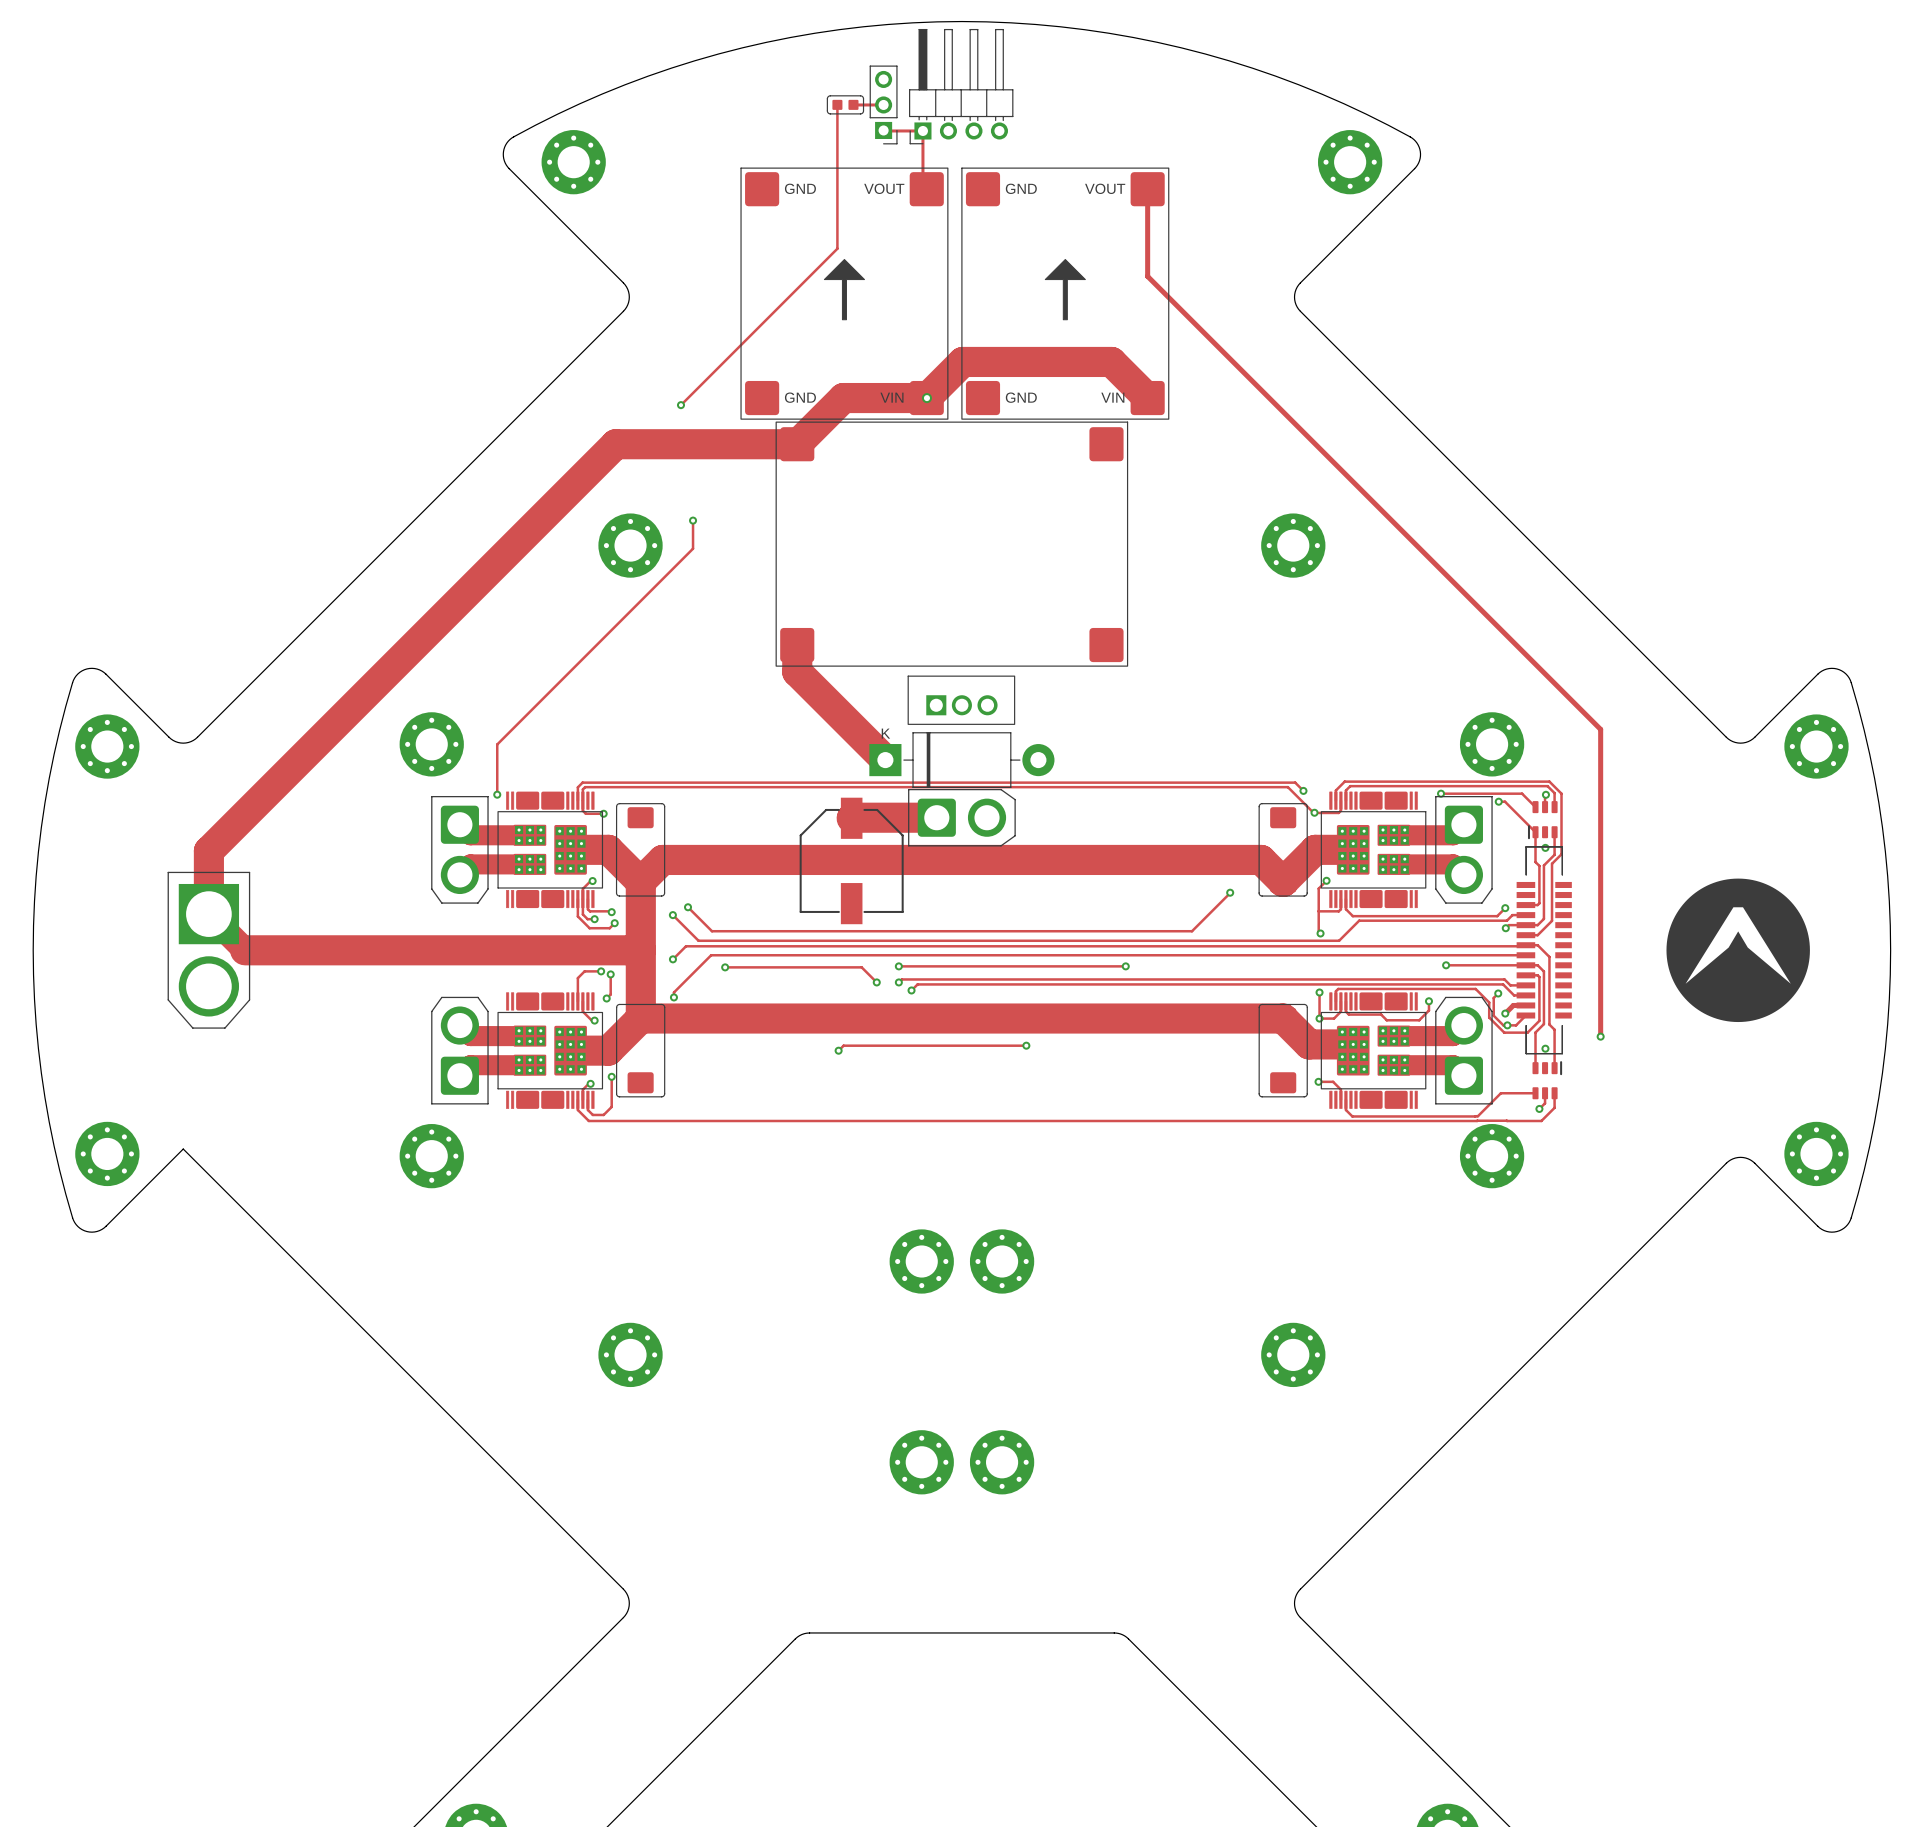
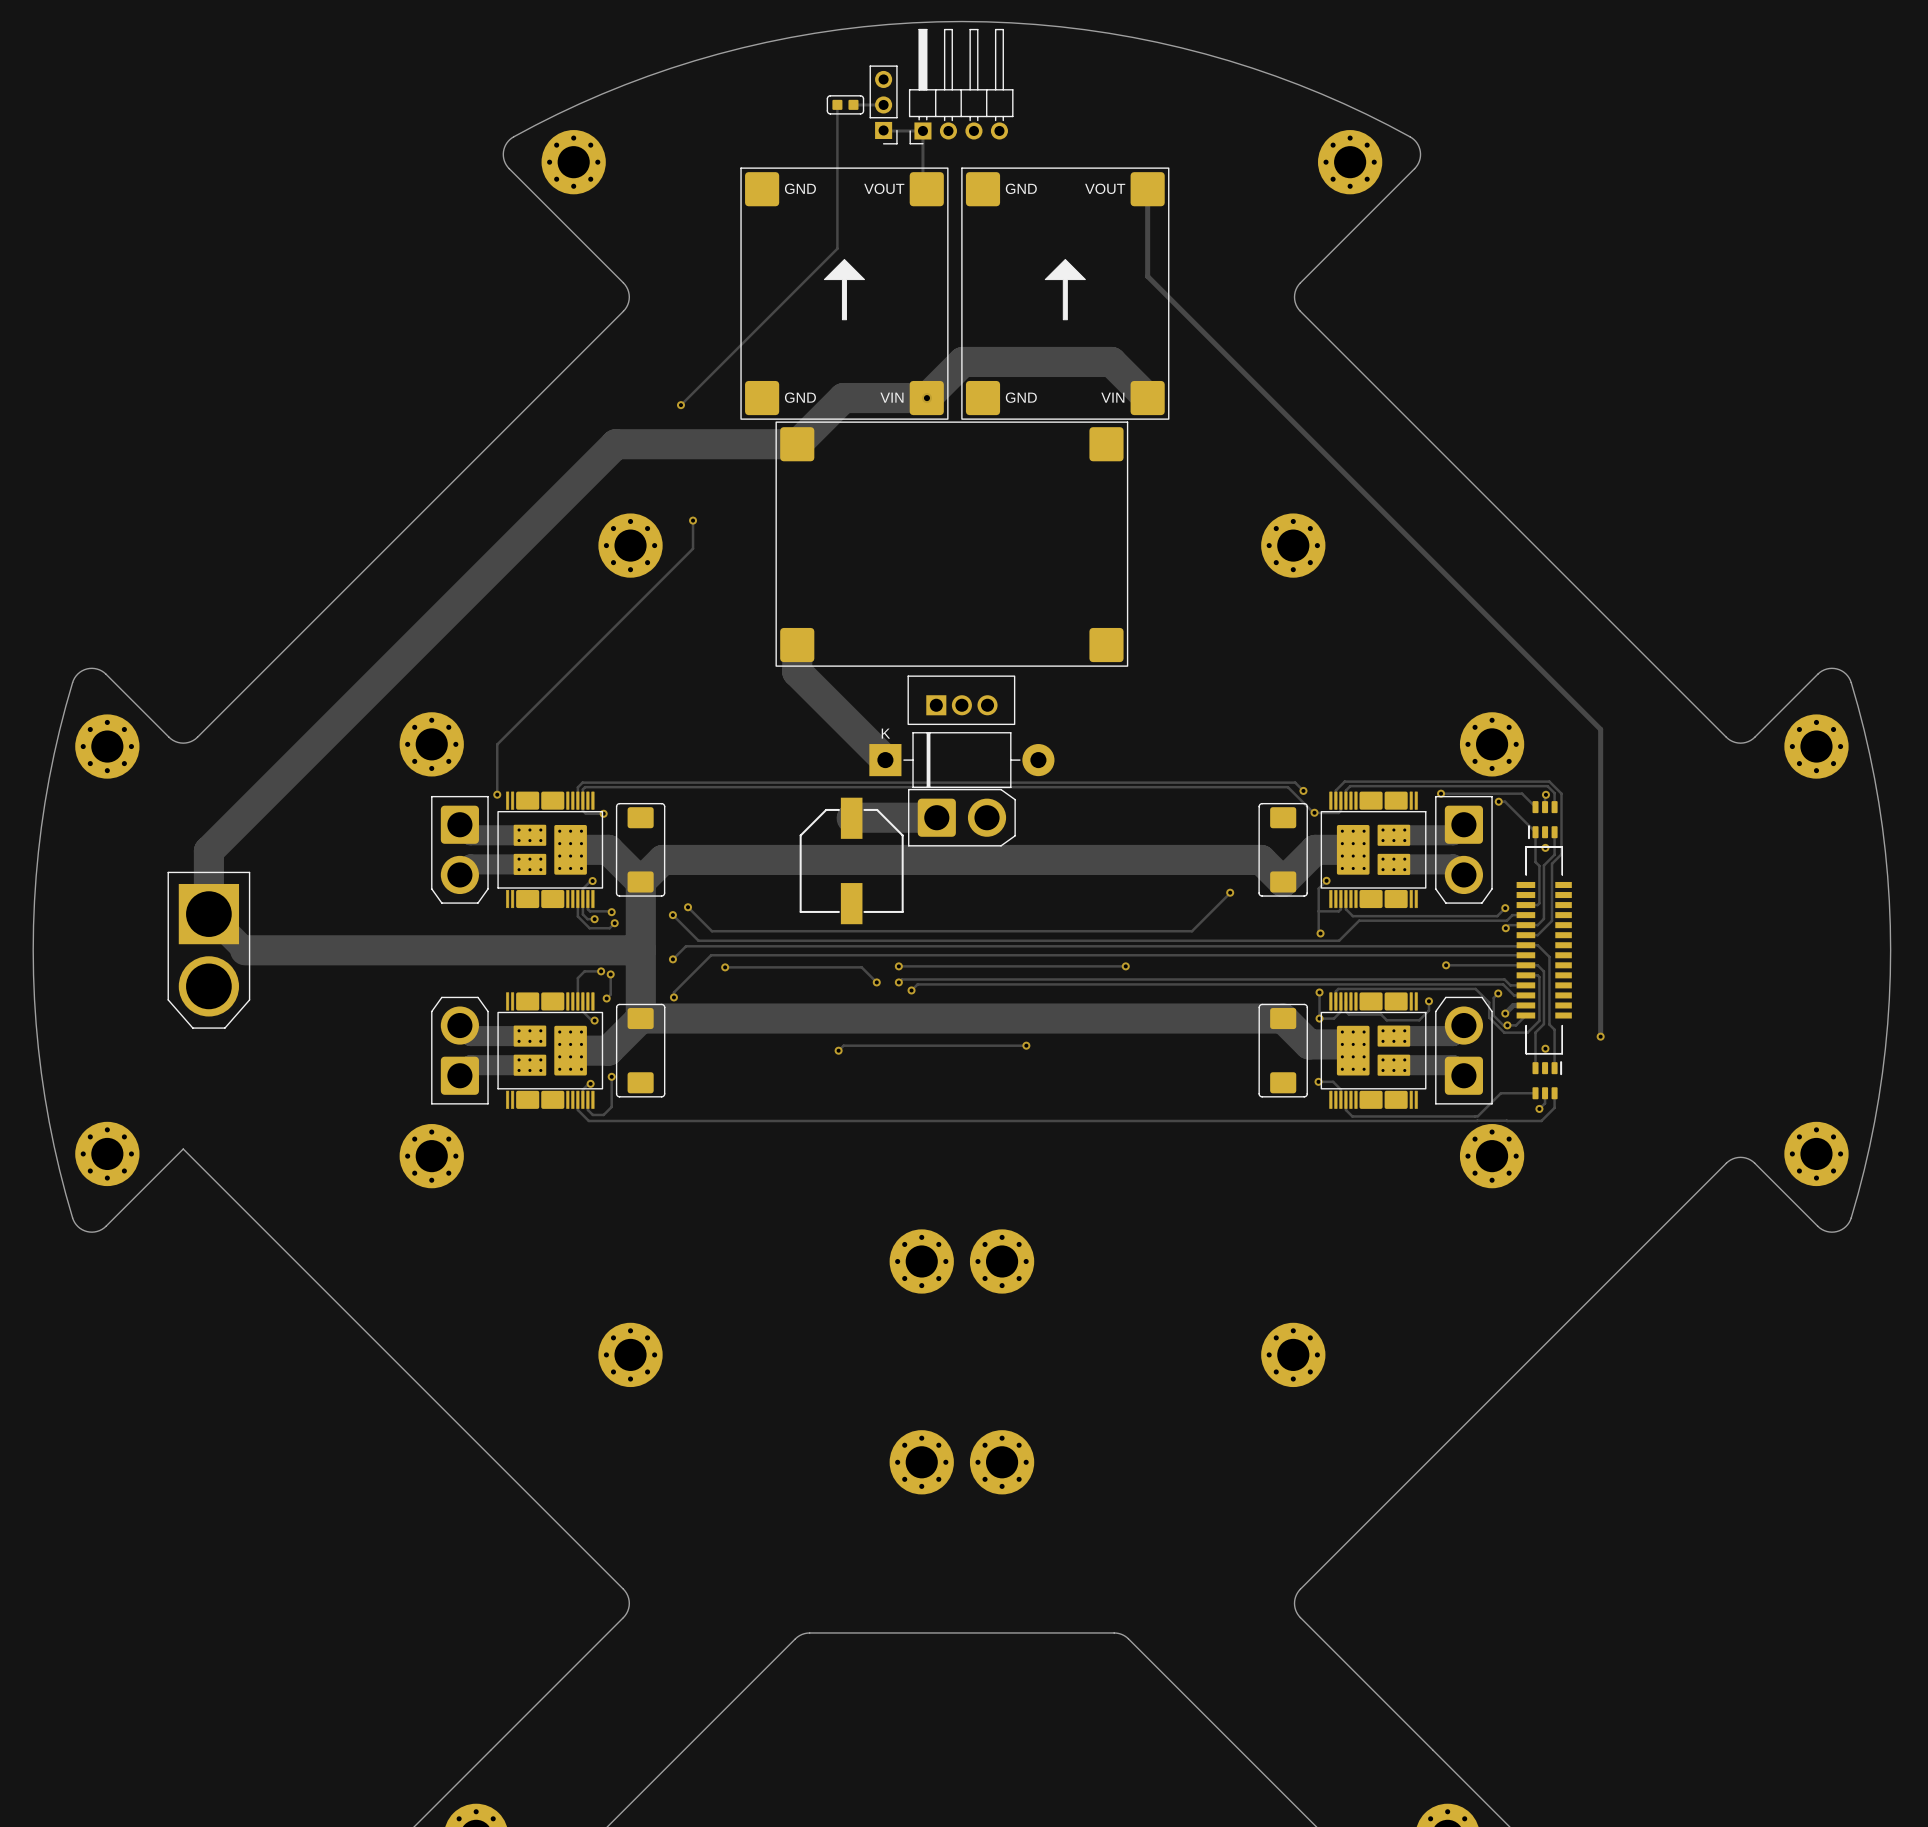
drawing: [1666, 878, 1810, 1023] -> none

